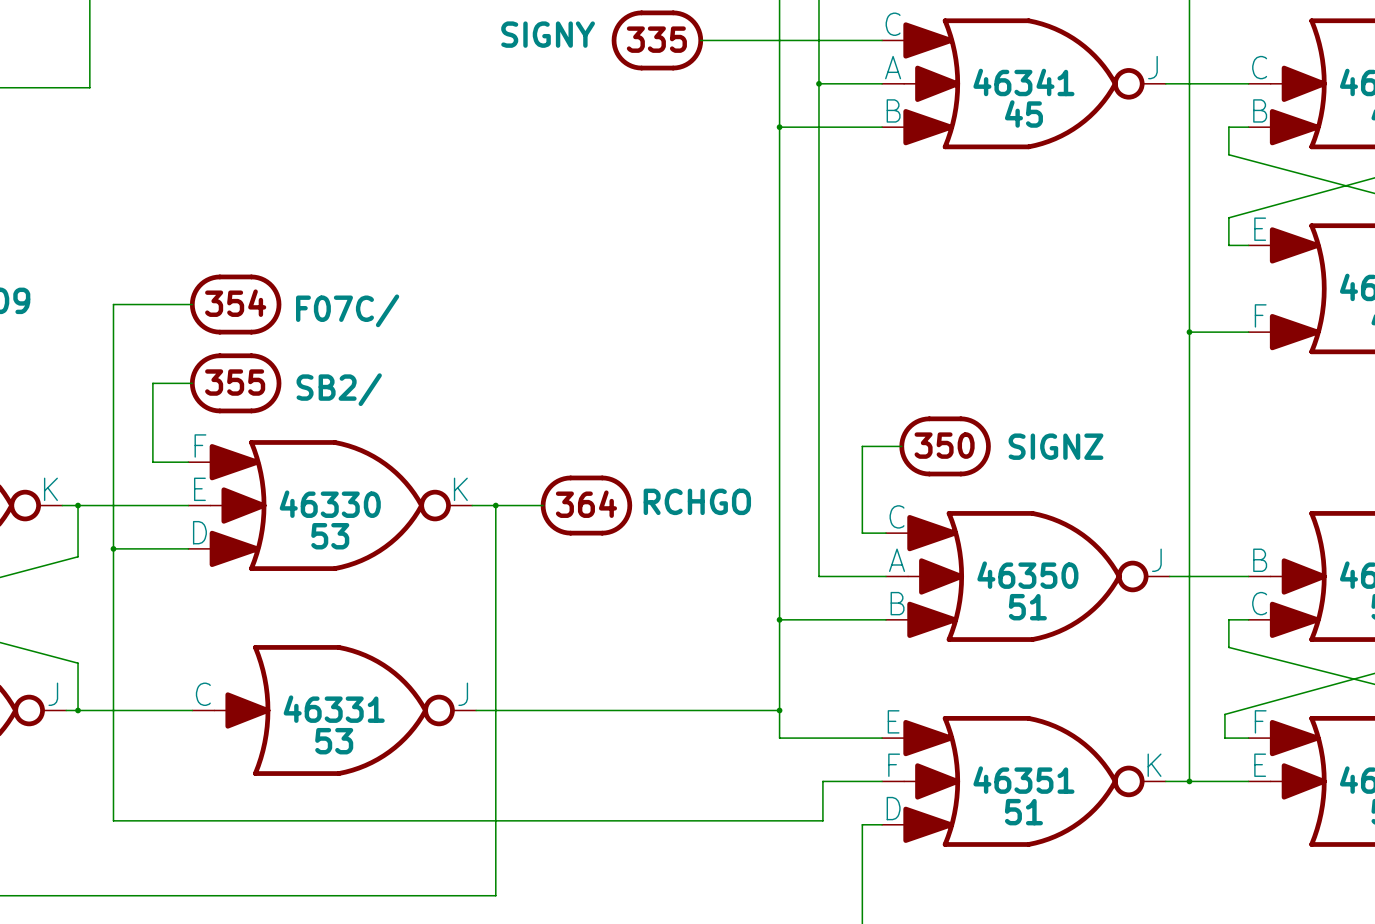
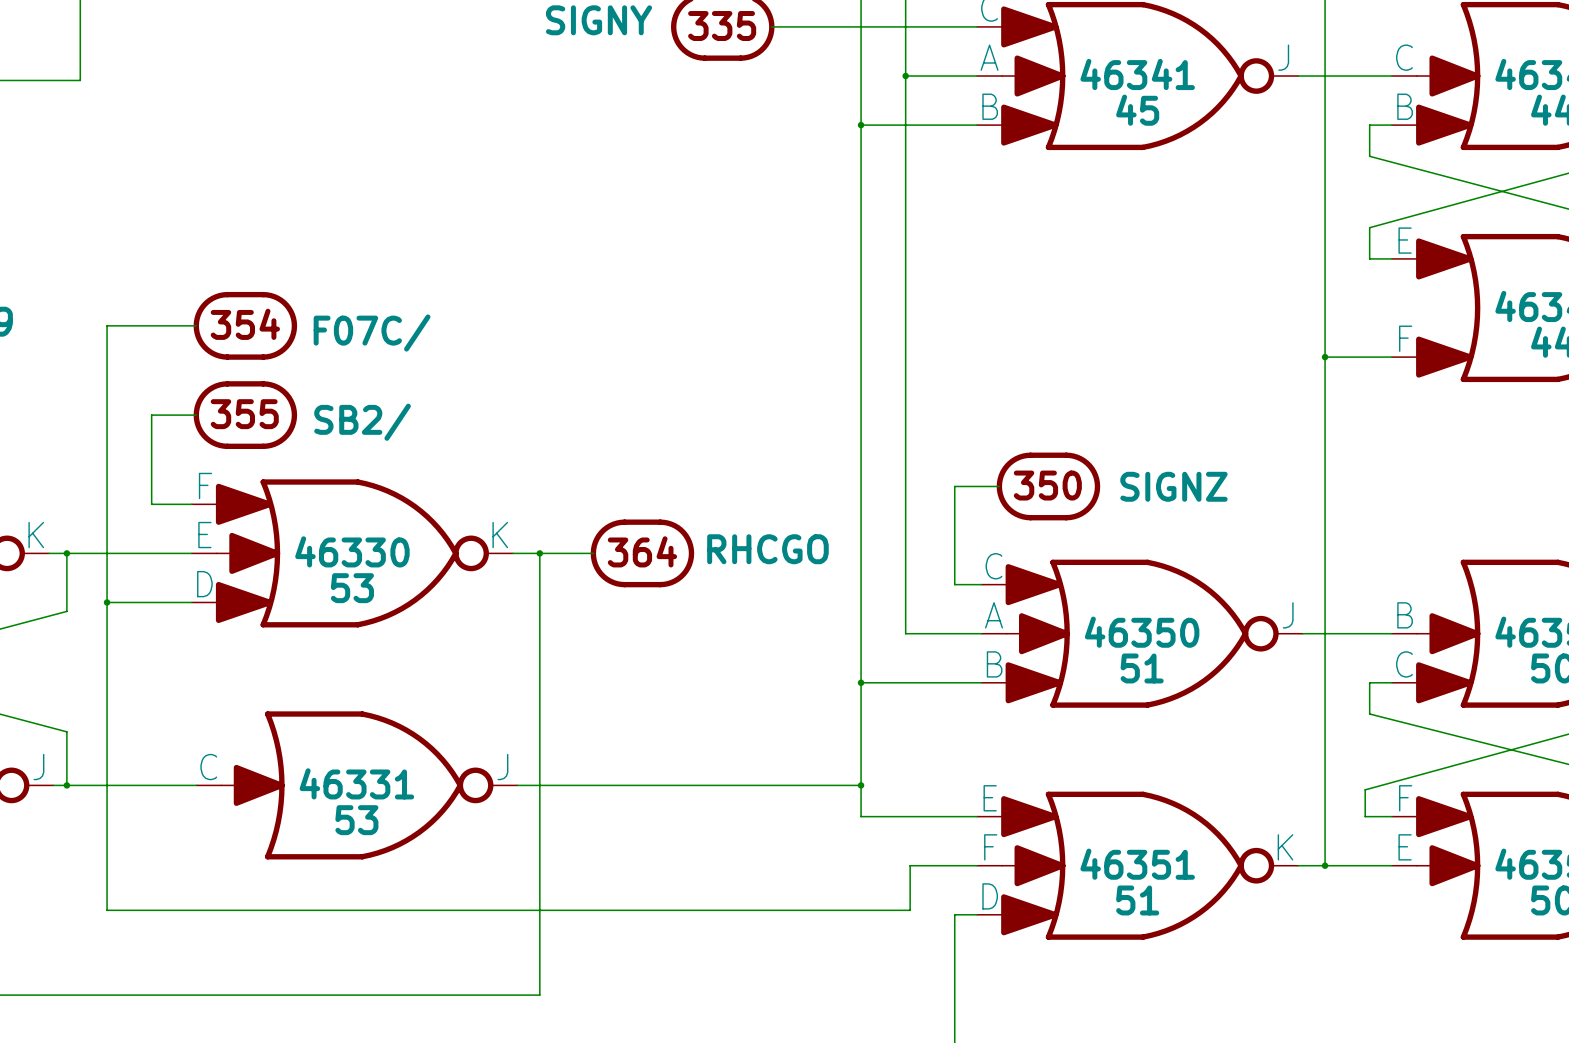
part text: RCHGO (697, 501) -> RHCGO (767, 549)

